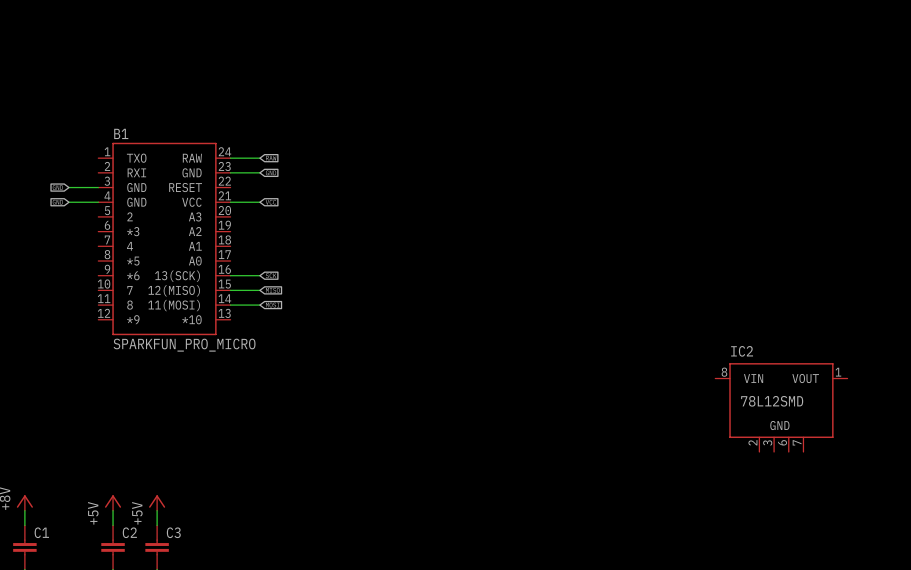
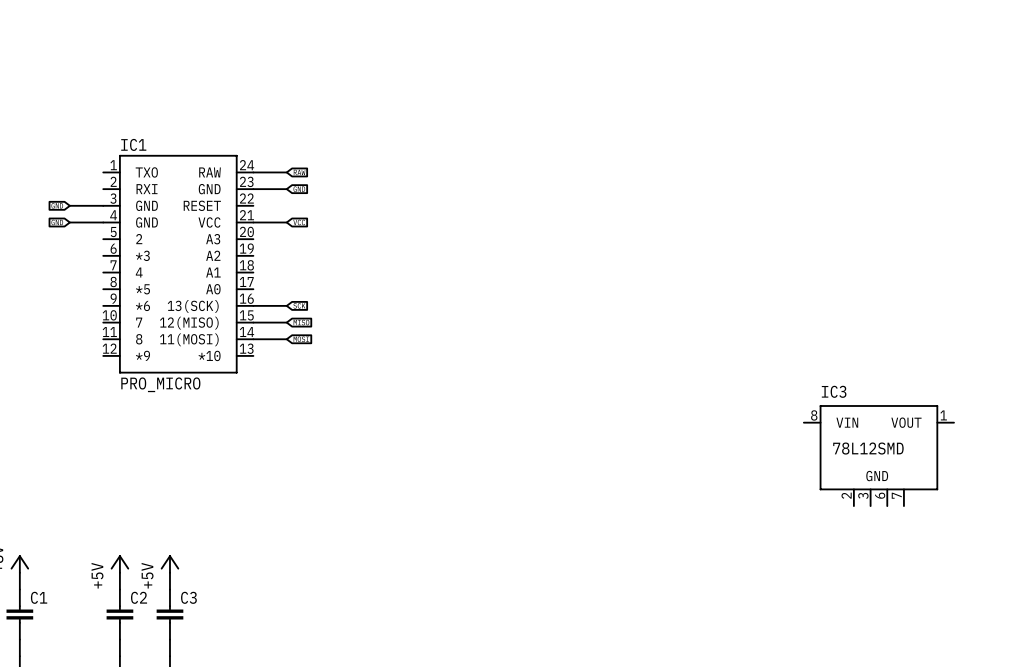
B1 name: B1 (121, 133) -> IC1 (133, 144)
B1 value: SPARKFUN_PRO_MICRO (184, 345) -> PRO_MICRO (160, 384)
IC2 name: IC2 (742, 351) -> IC3 (834, 391)

